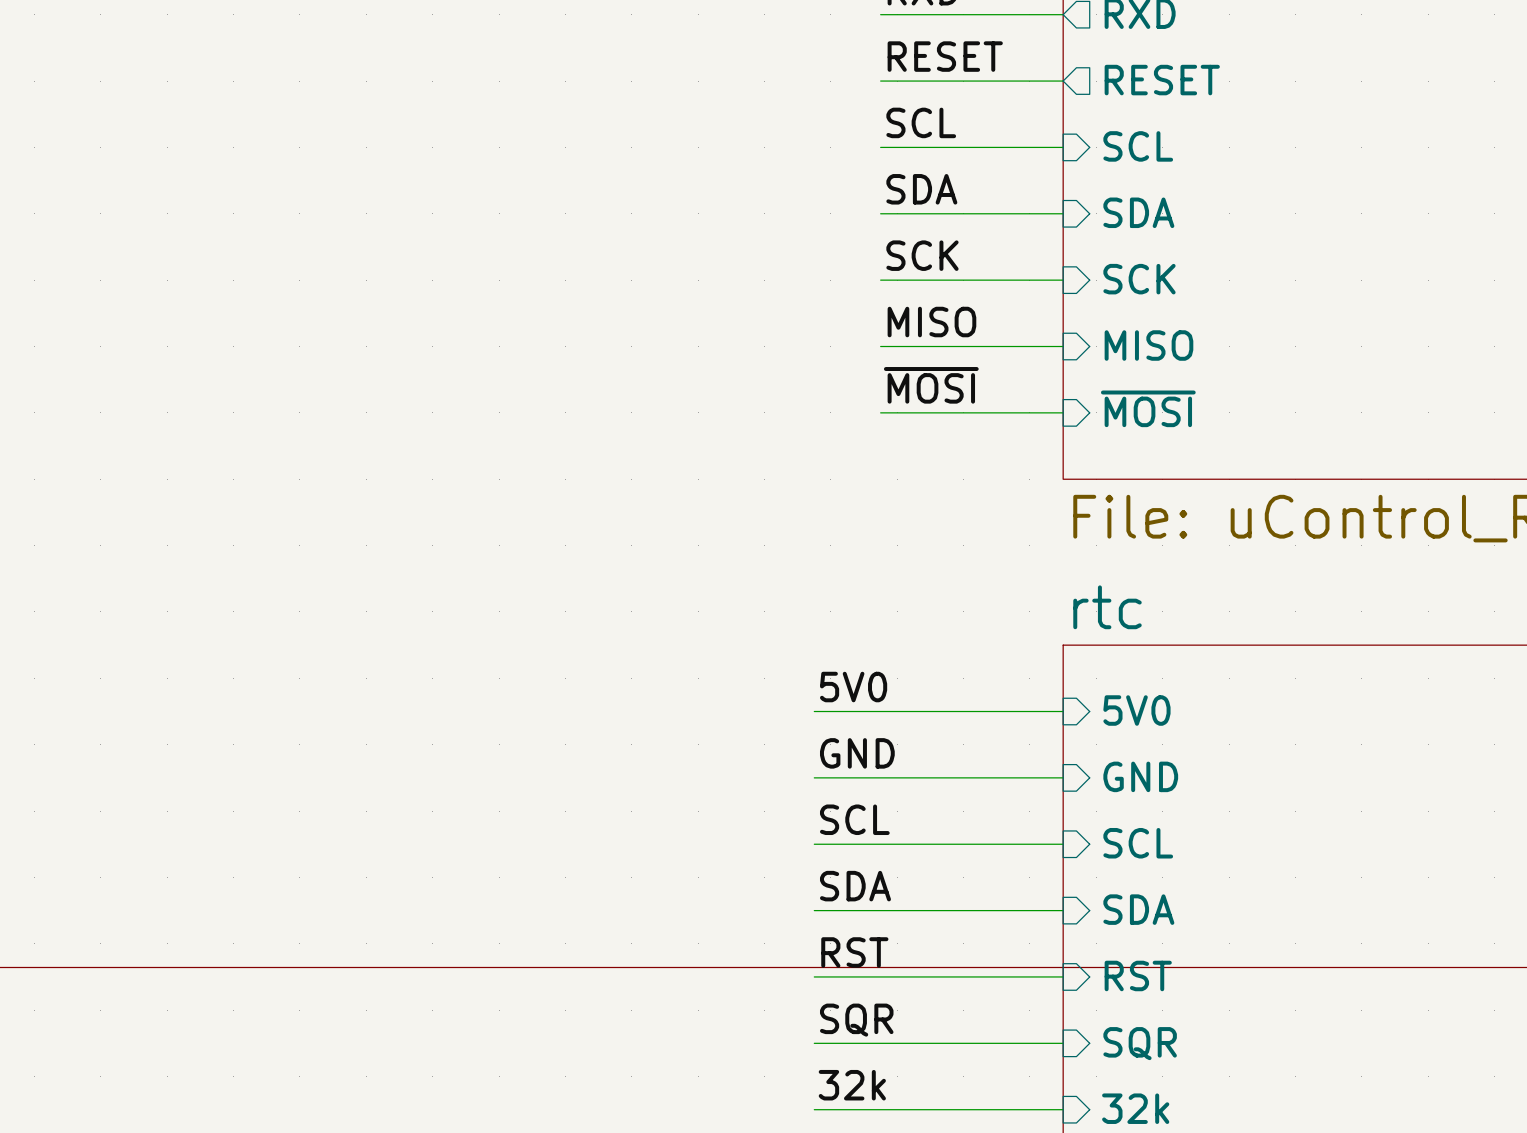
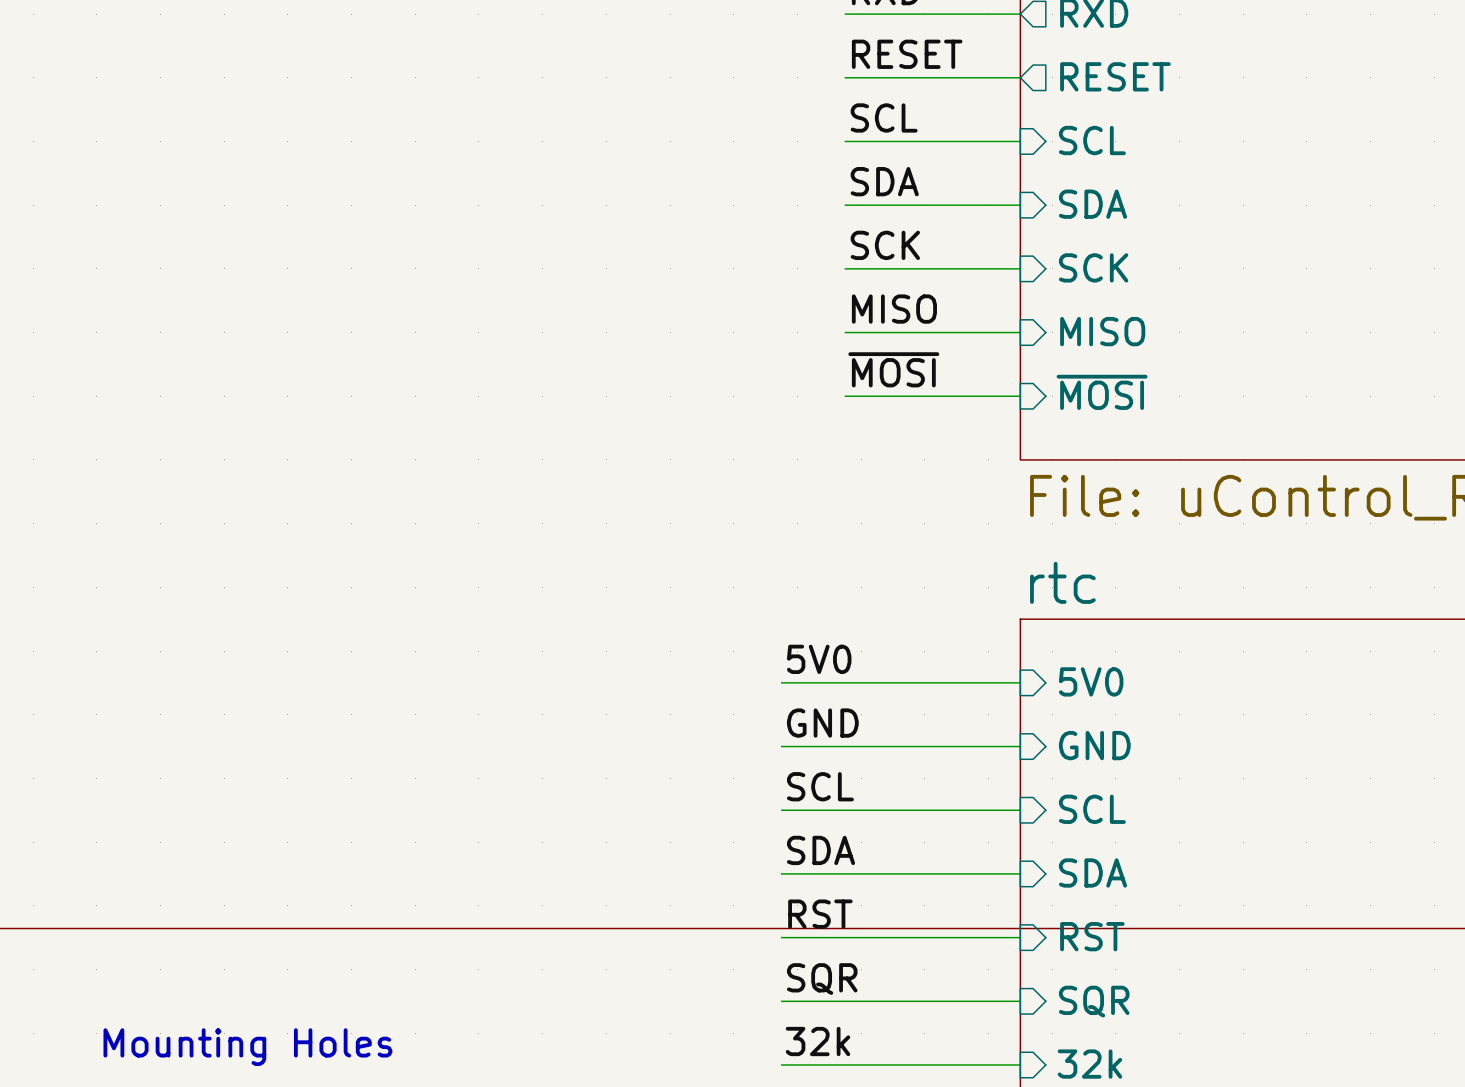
text: none -> Mounting Holes (247, 1047)

